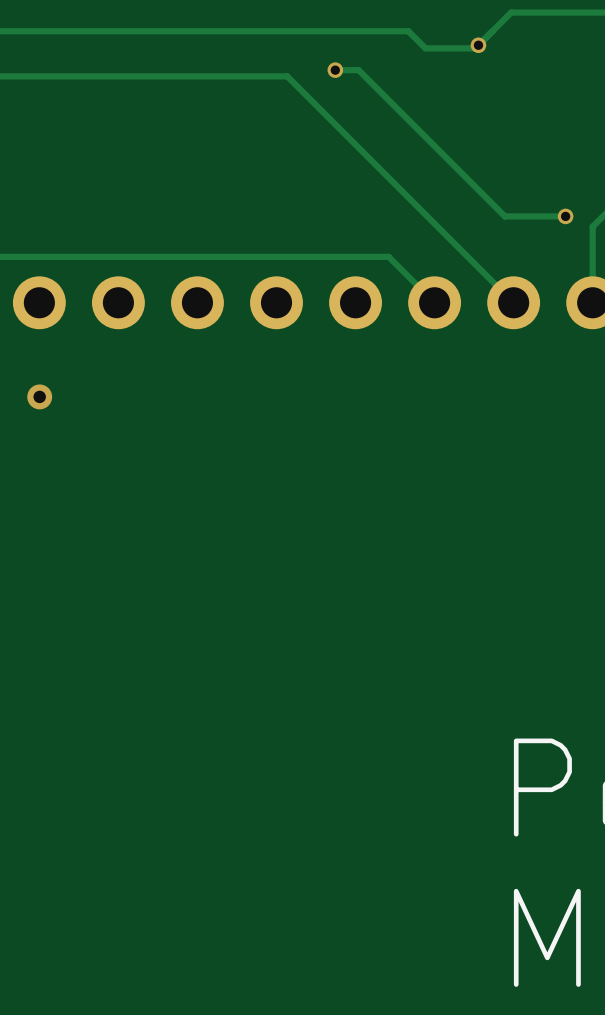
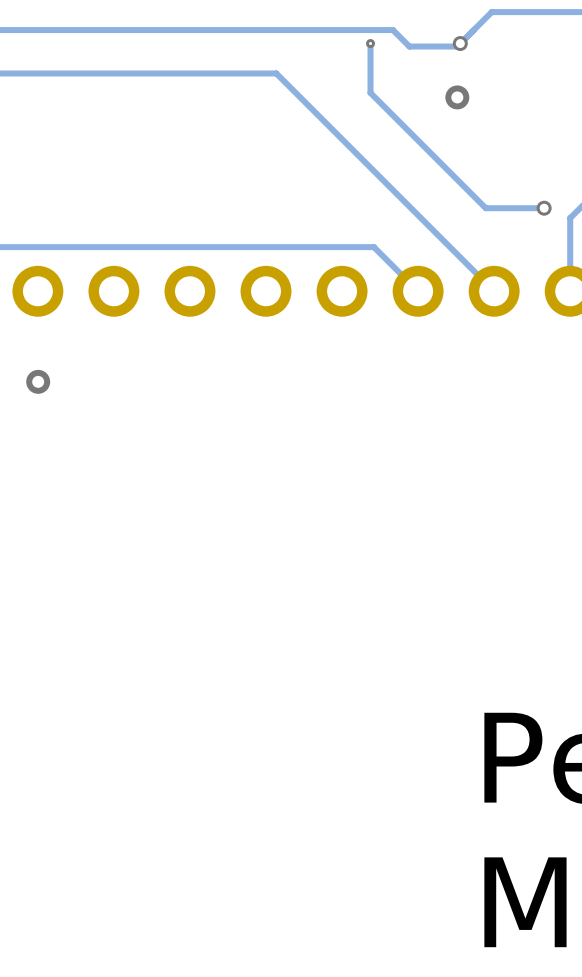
via: none -> (370, 43)
track: (335, 70) (358, 70) (385, 96) -> (370, 43) (370, 92)
via: (335, 70) -> none
via: none -> (457, 97)

